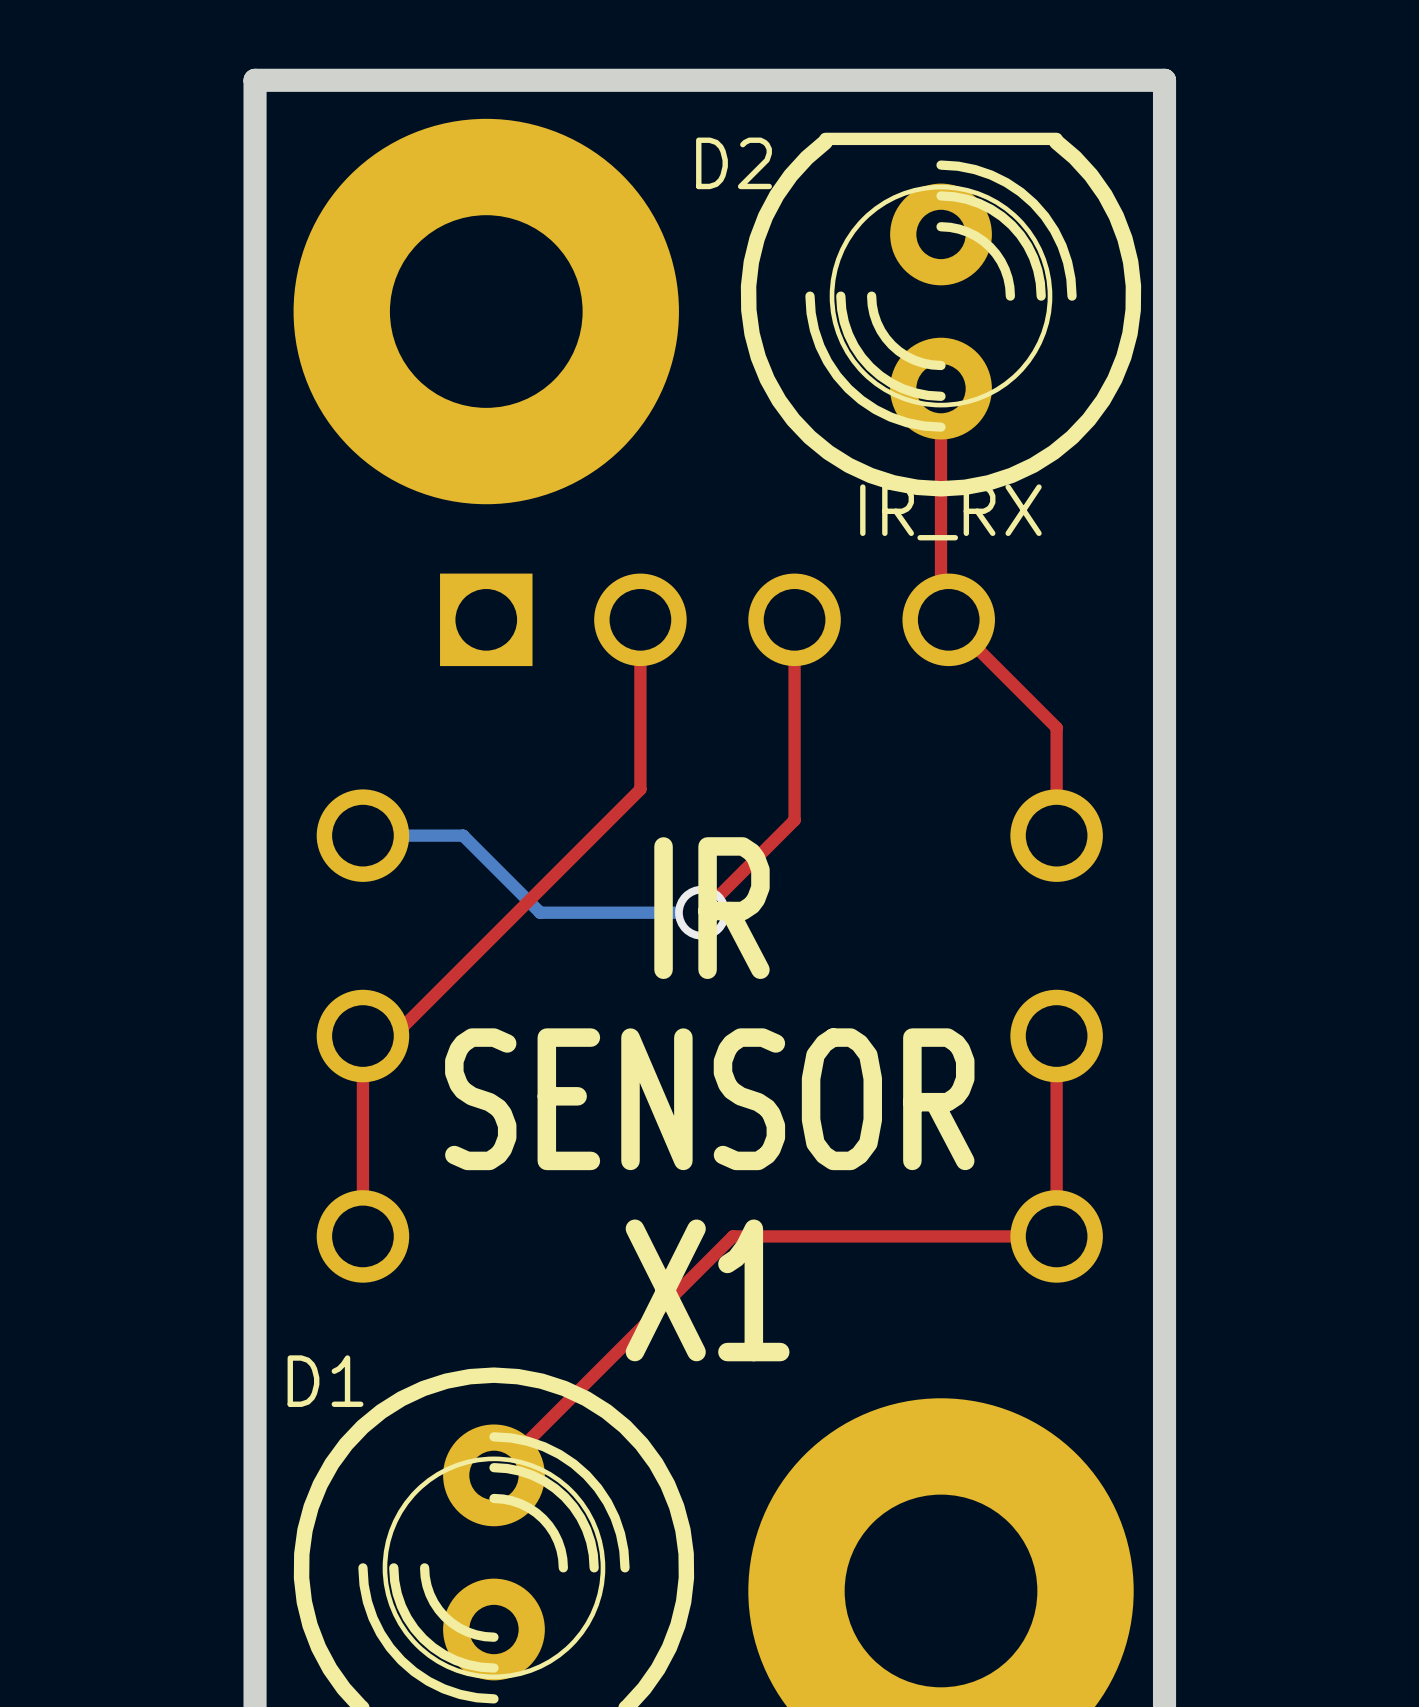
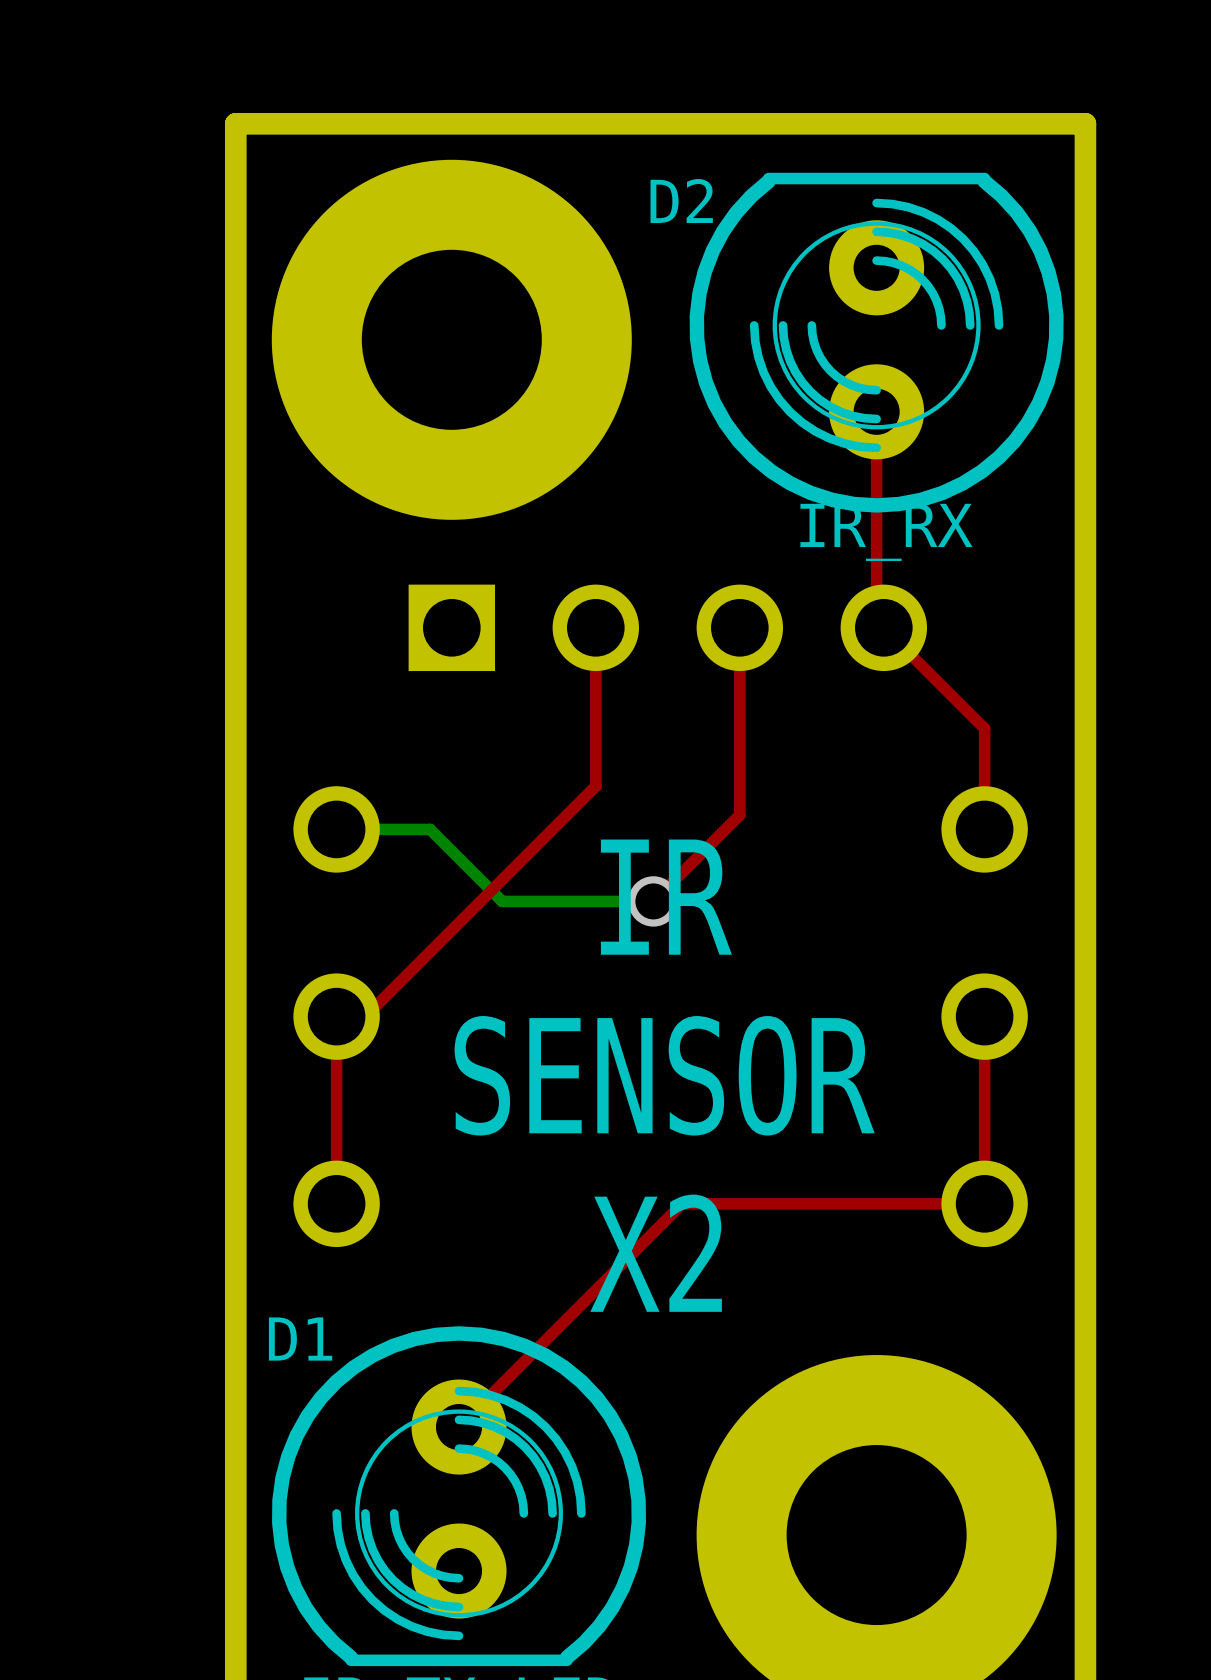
text: X1 (707, 1290) -> X2 (656, 1253)

